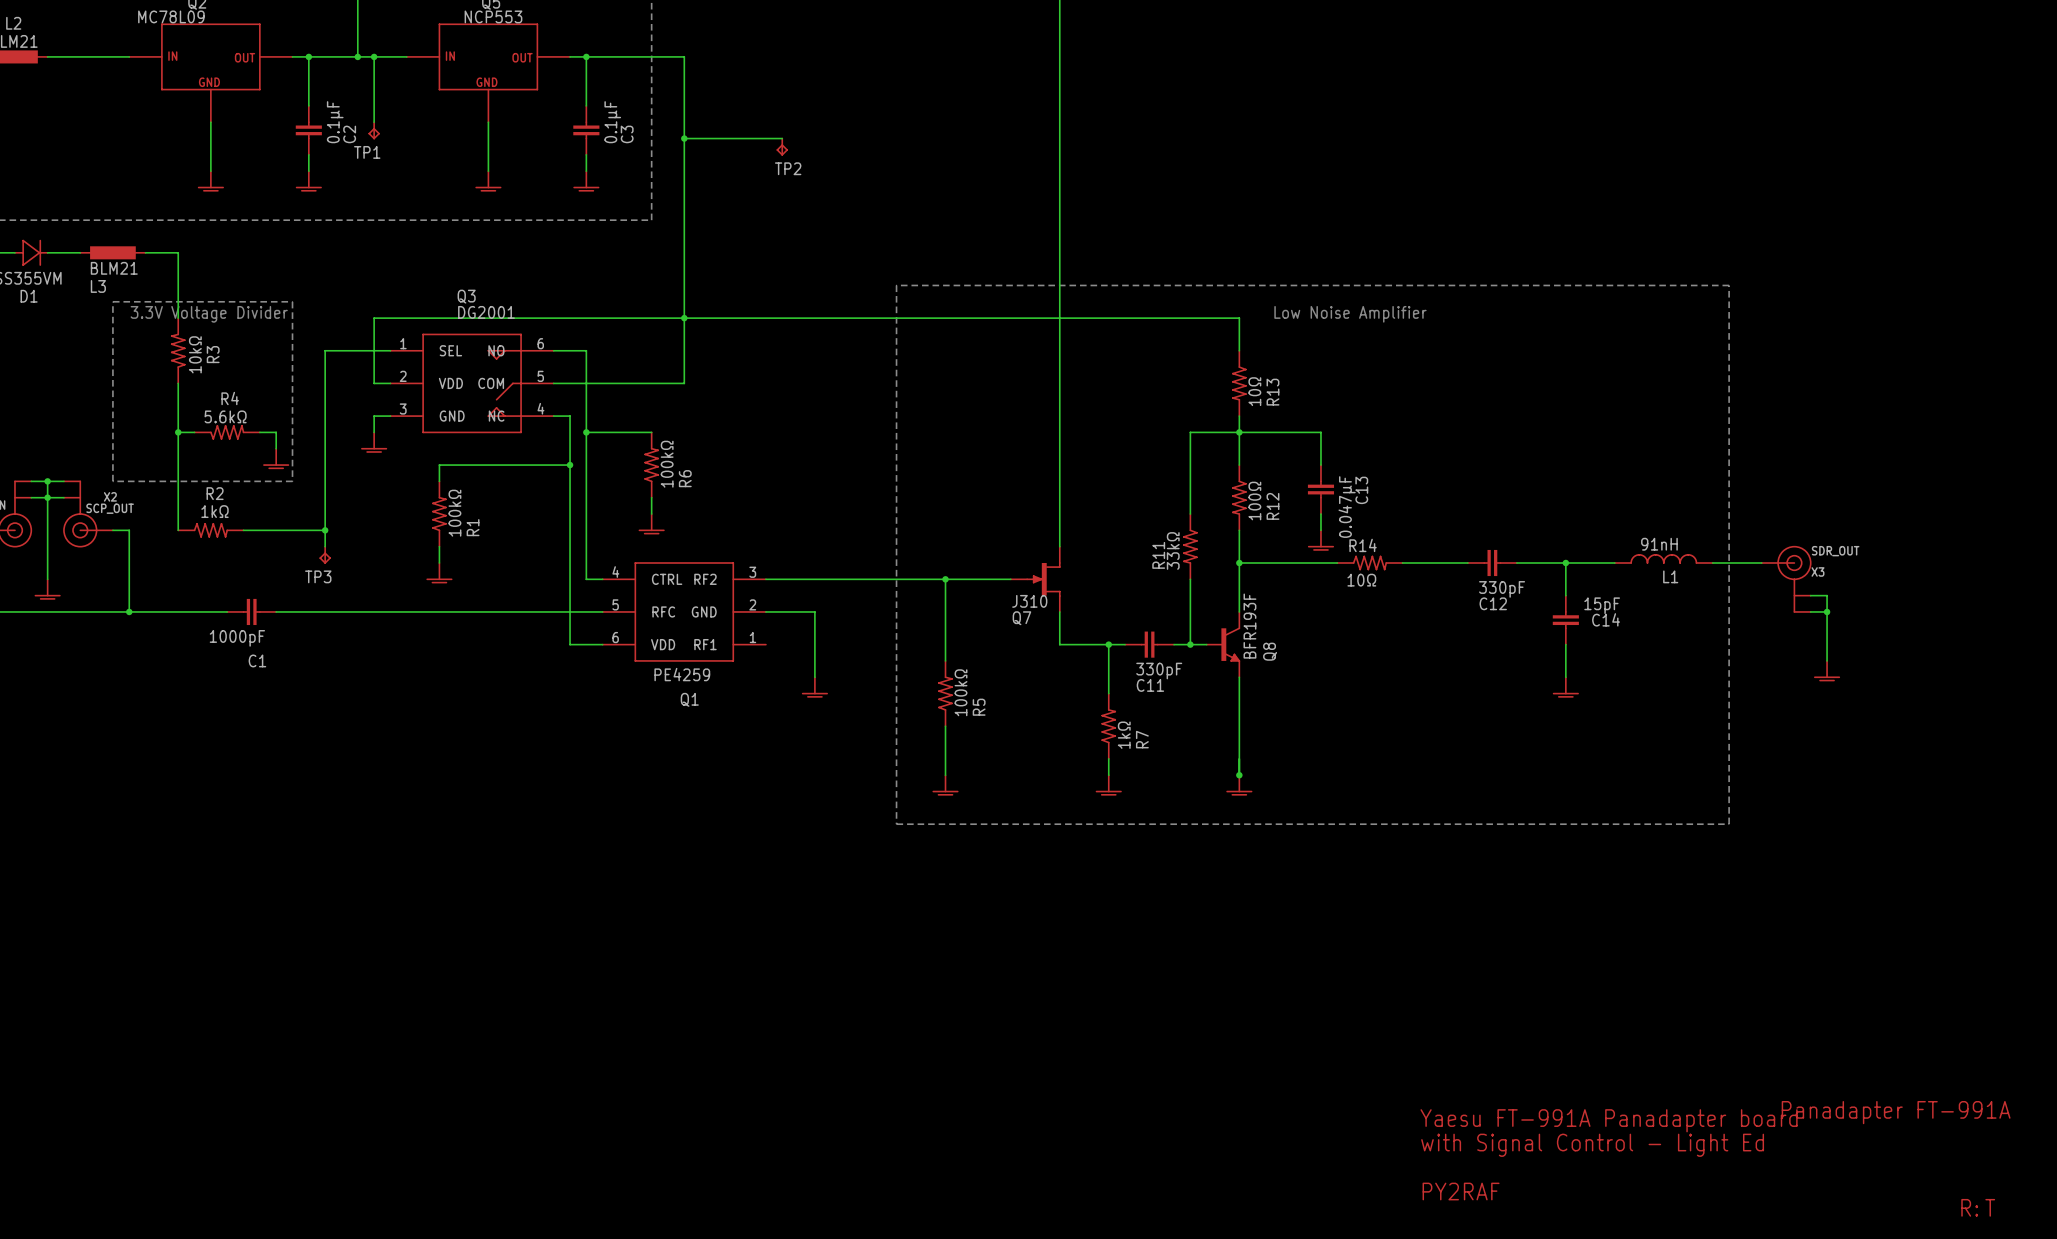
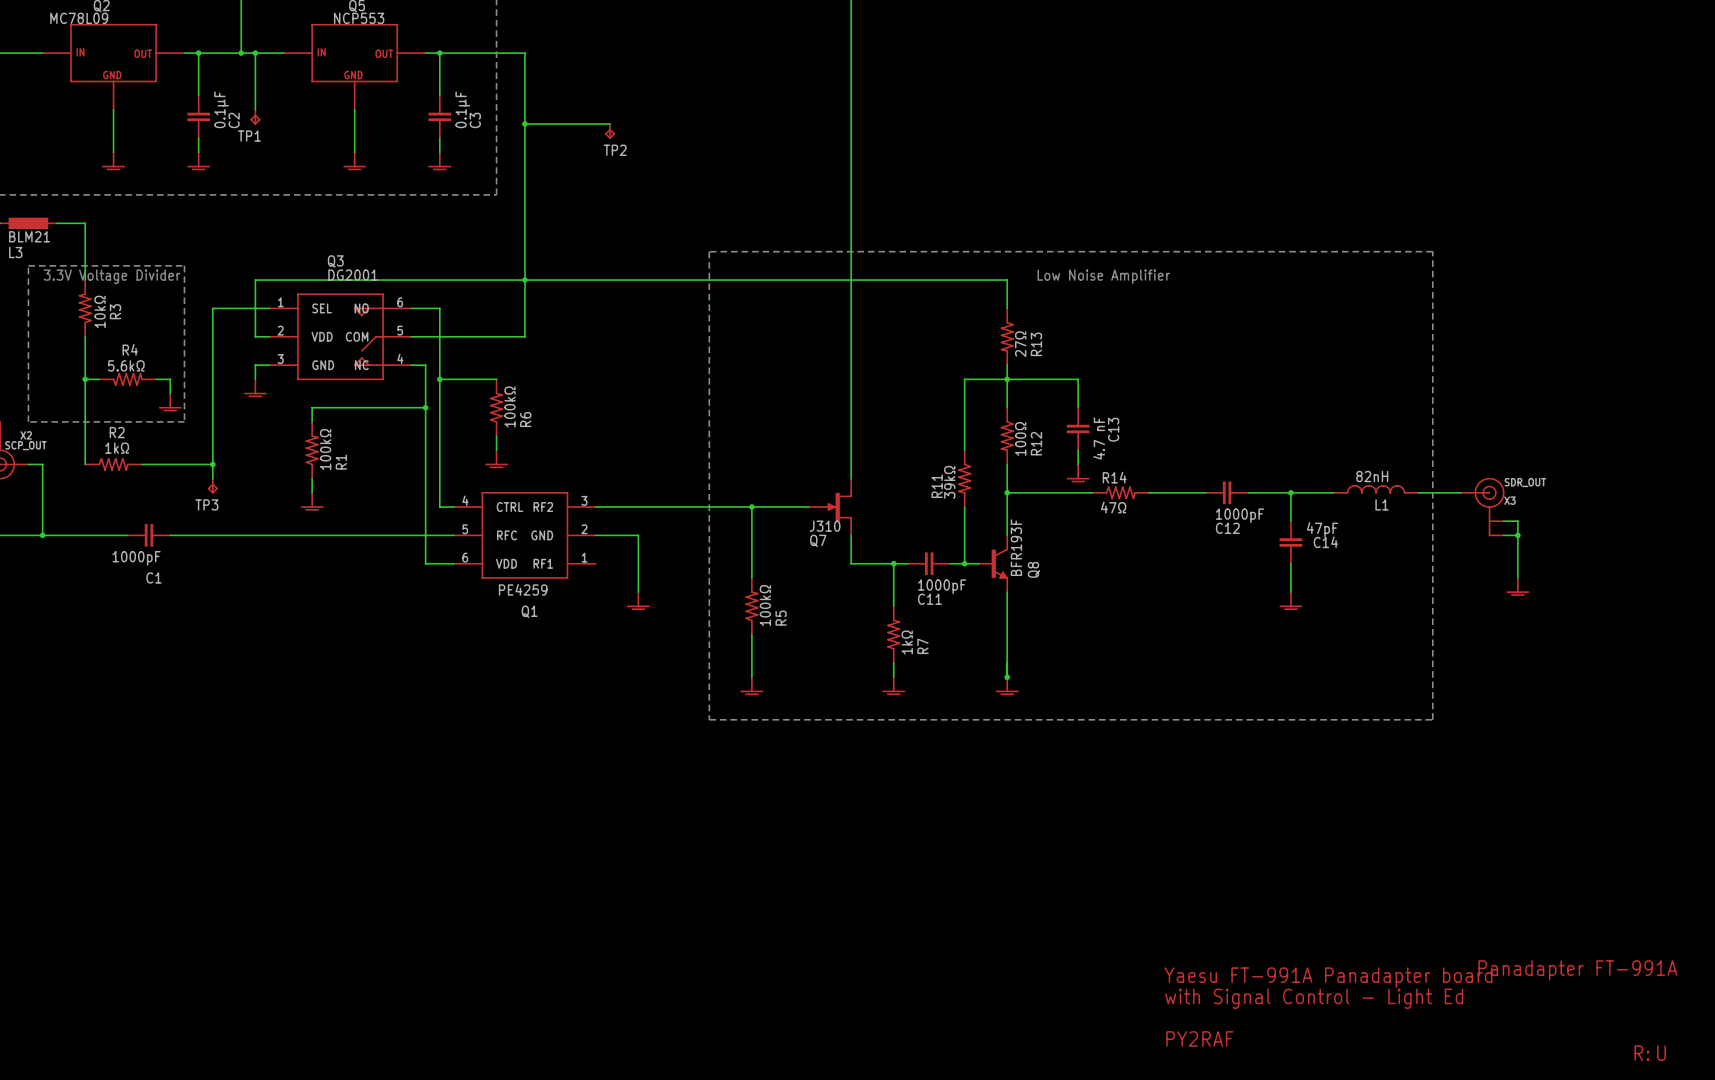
R13 value: 10Ω (1254, 391) -> 27Ω (1020, 344)
C13 value: 0.047µF (1347, 507) -> 4.7 nF (1099, 438)
L1 value: 91nH (1659, 544) -> 82nH (1372, 476)
R11 value: 33kΩ (1173, 550) -> 39kΩ (949, 482)
R14 value: 10Ω (1361, 580) -> 47Ω (1113, 507)
C12 value: 330pF (1502, 589) -> 1000pF (1239, 515)
C14 value: 15pF (1602, 605) -> 47pF (1322, 529)
C11 value: 330pF (1159, 671) -> 1000pF (942, 586)
text: T (1990, 1207) -> U (1661, 1053)

